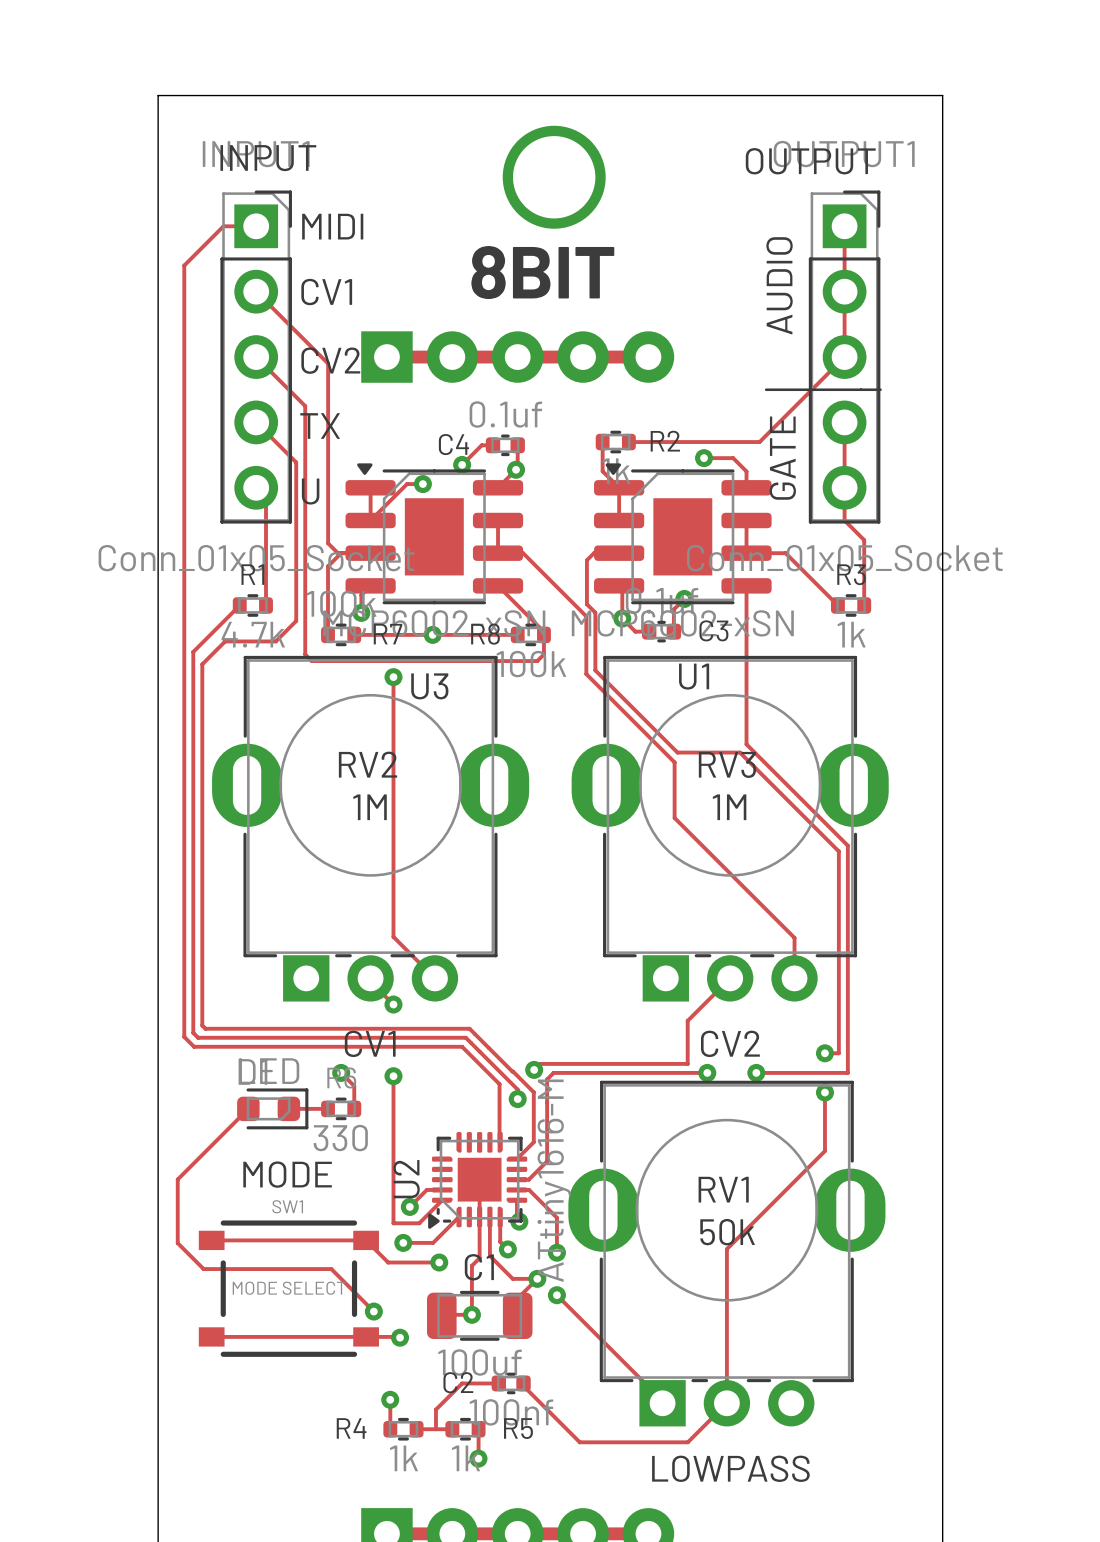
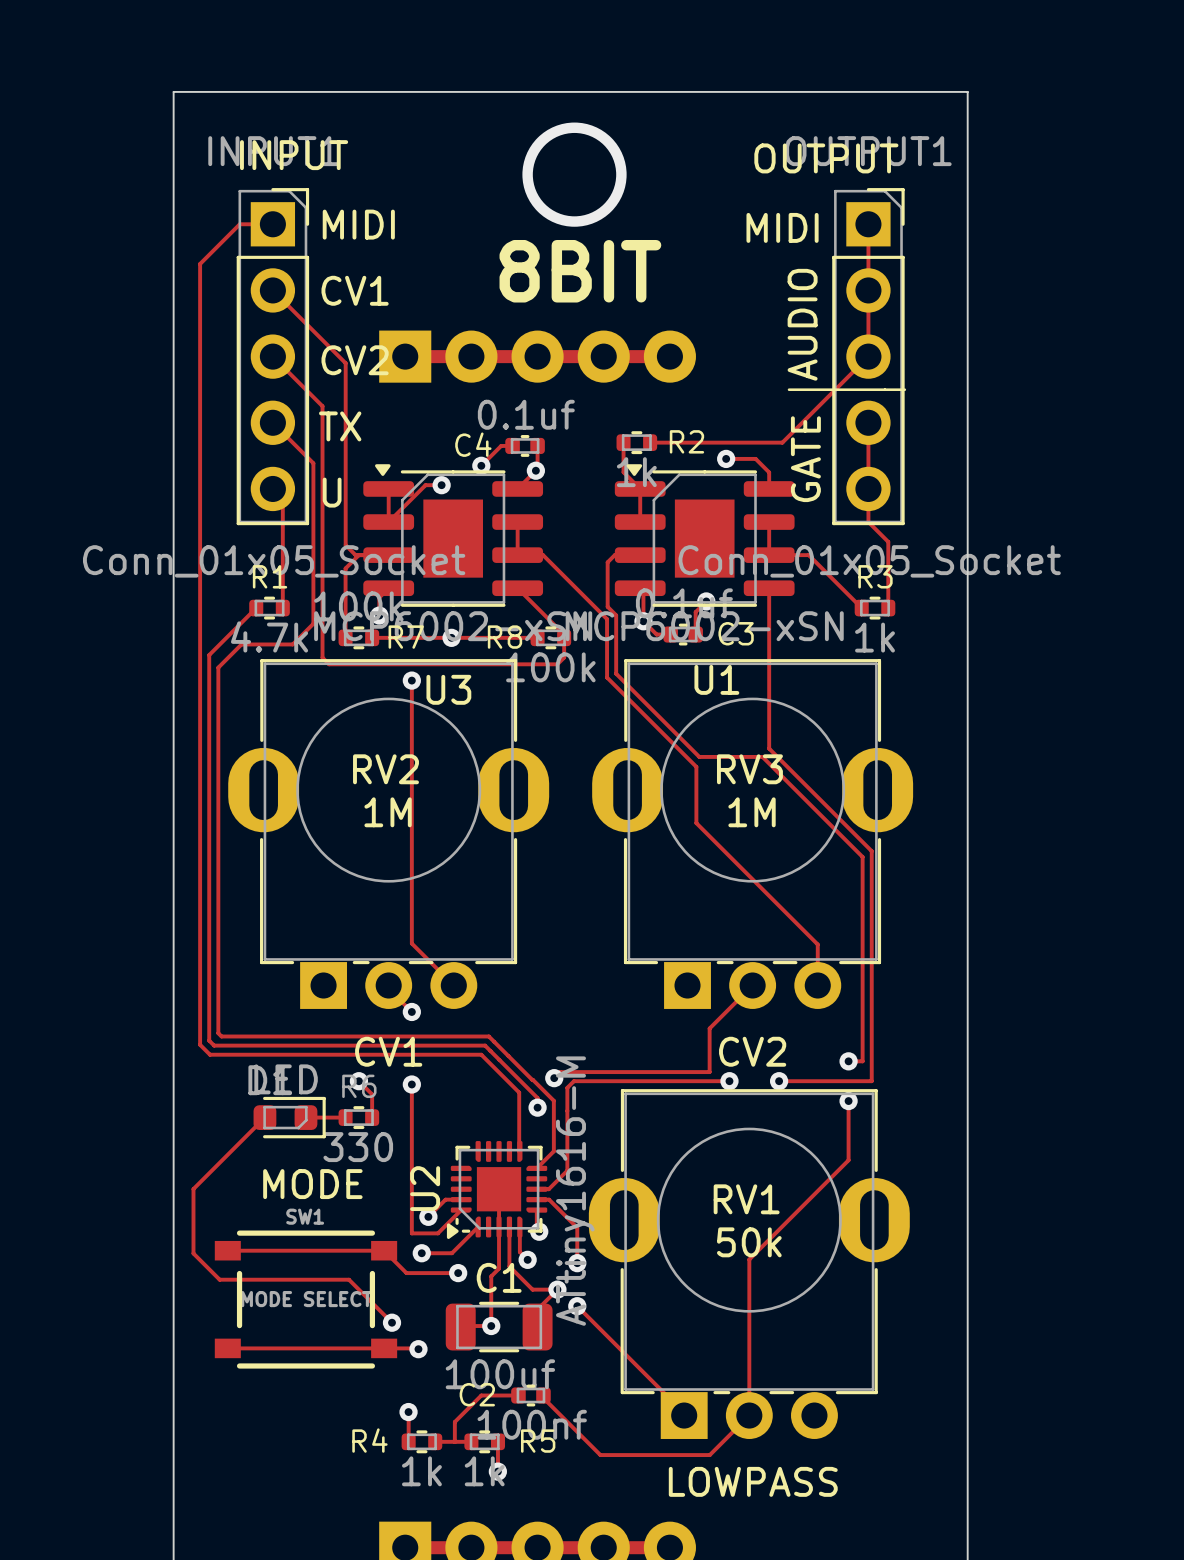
text: none -> MIDI (782, 227)
text position: AUDIO (779, 285) -> AUDIO (802, 324)

